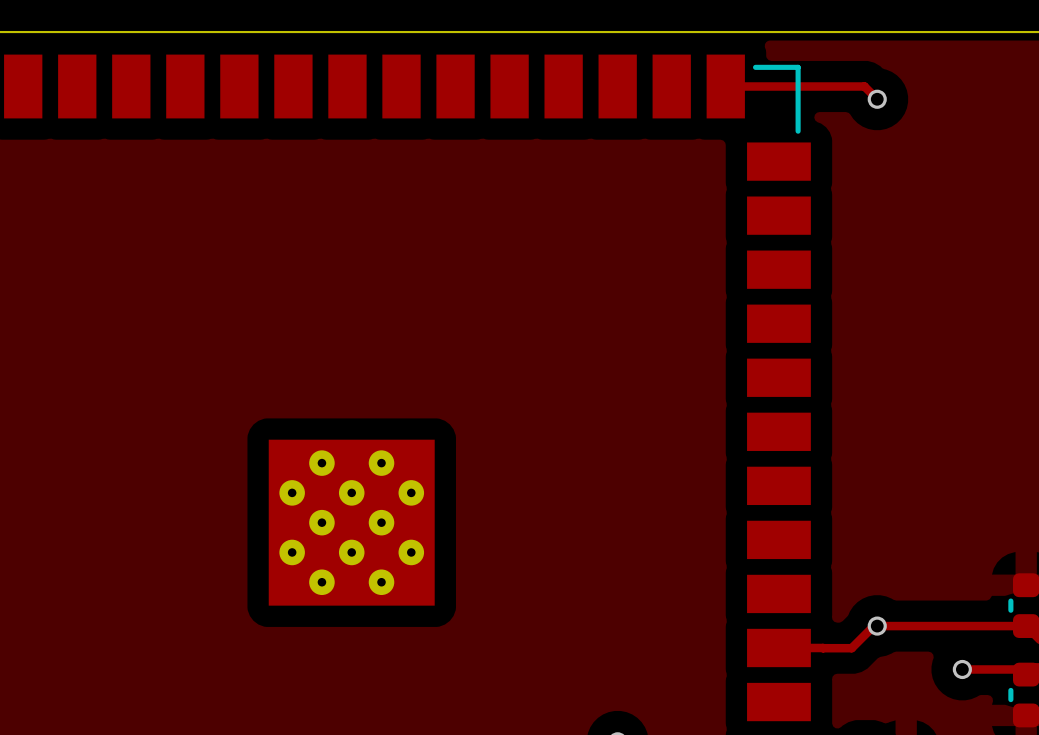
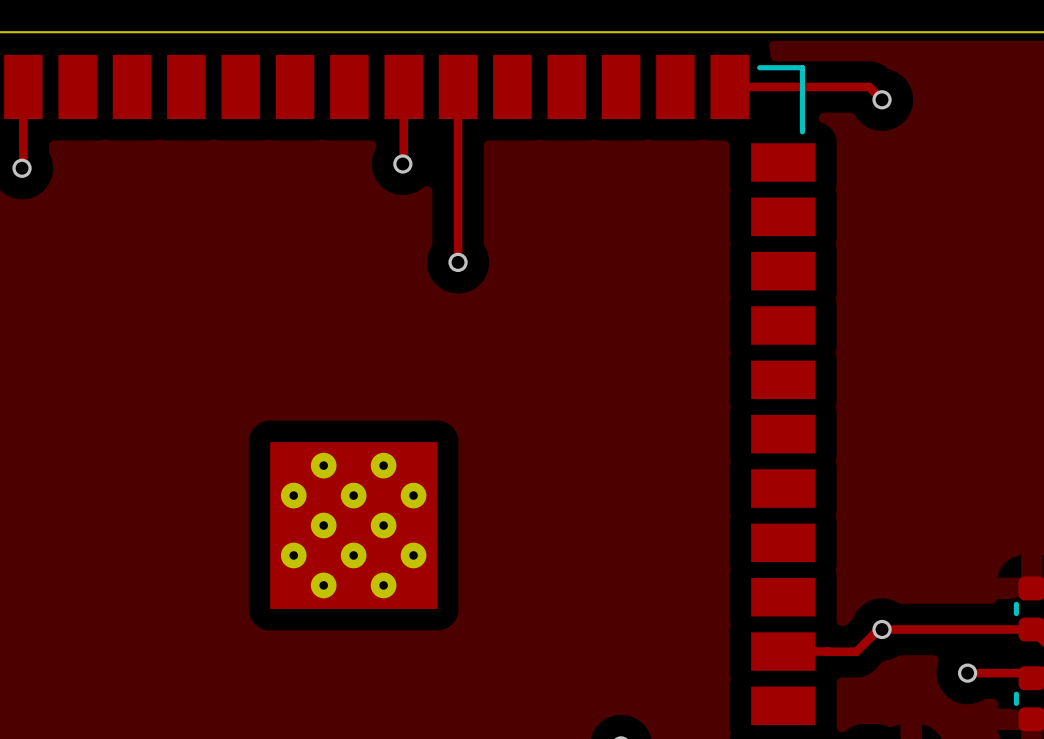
track: none -> (23, 86) (22, 168)
track: none -> (403, 86) (402, 163)
track: none -> (458, 86) (458, 262)
via: none -> (402, 163)
via: none -> (22, 168)
via: none -> (458, 262)

